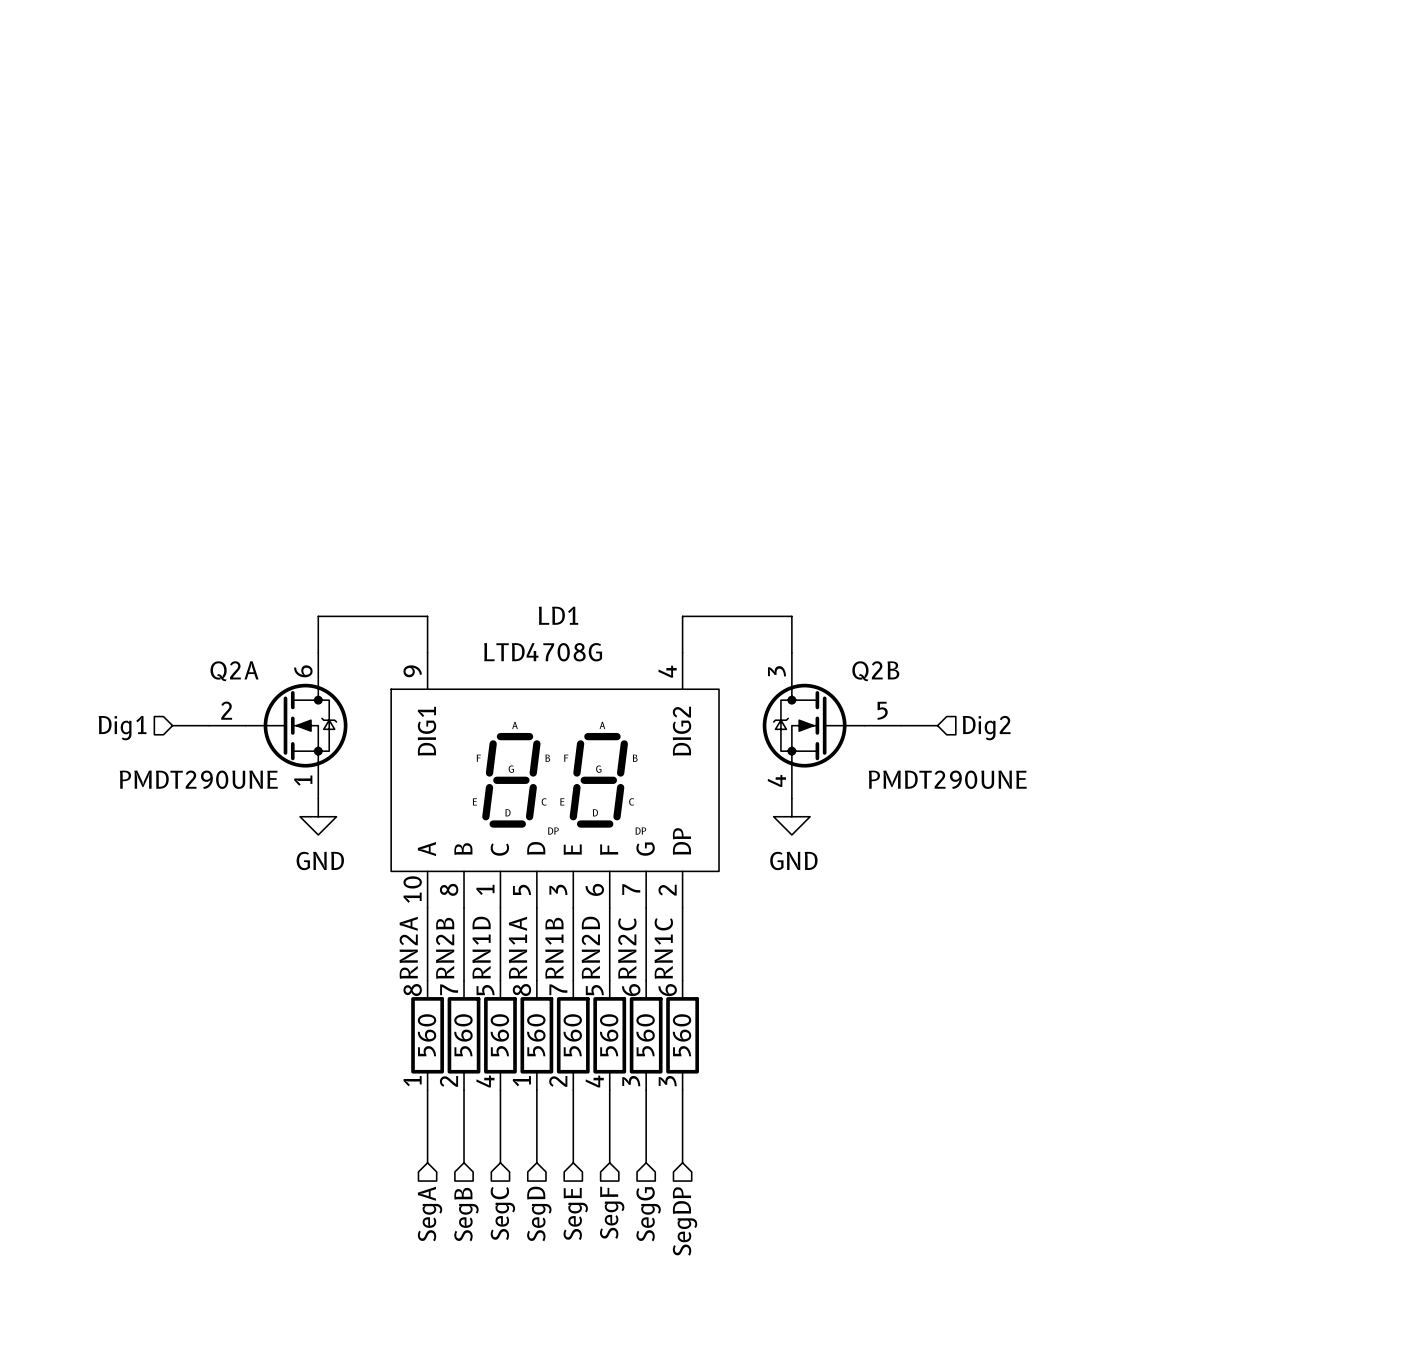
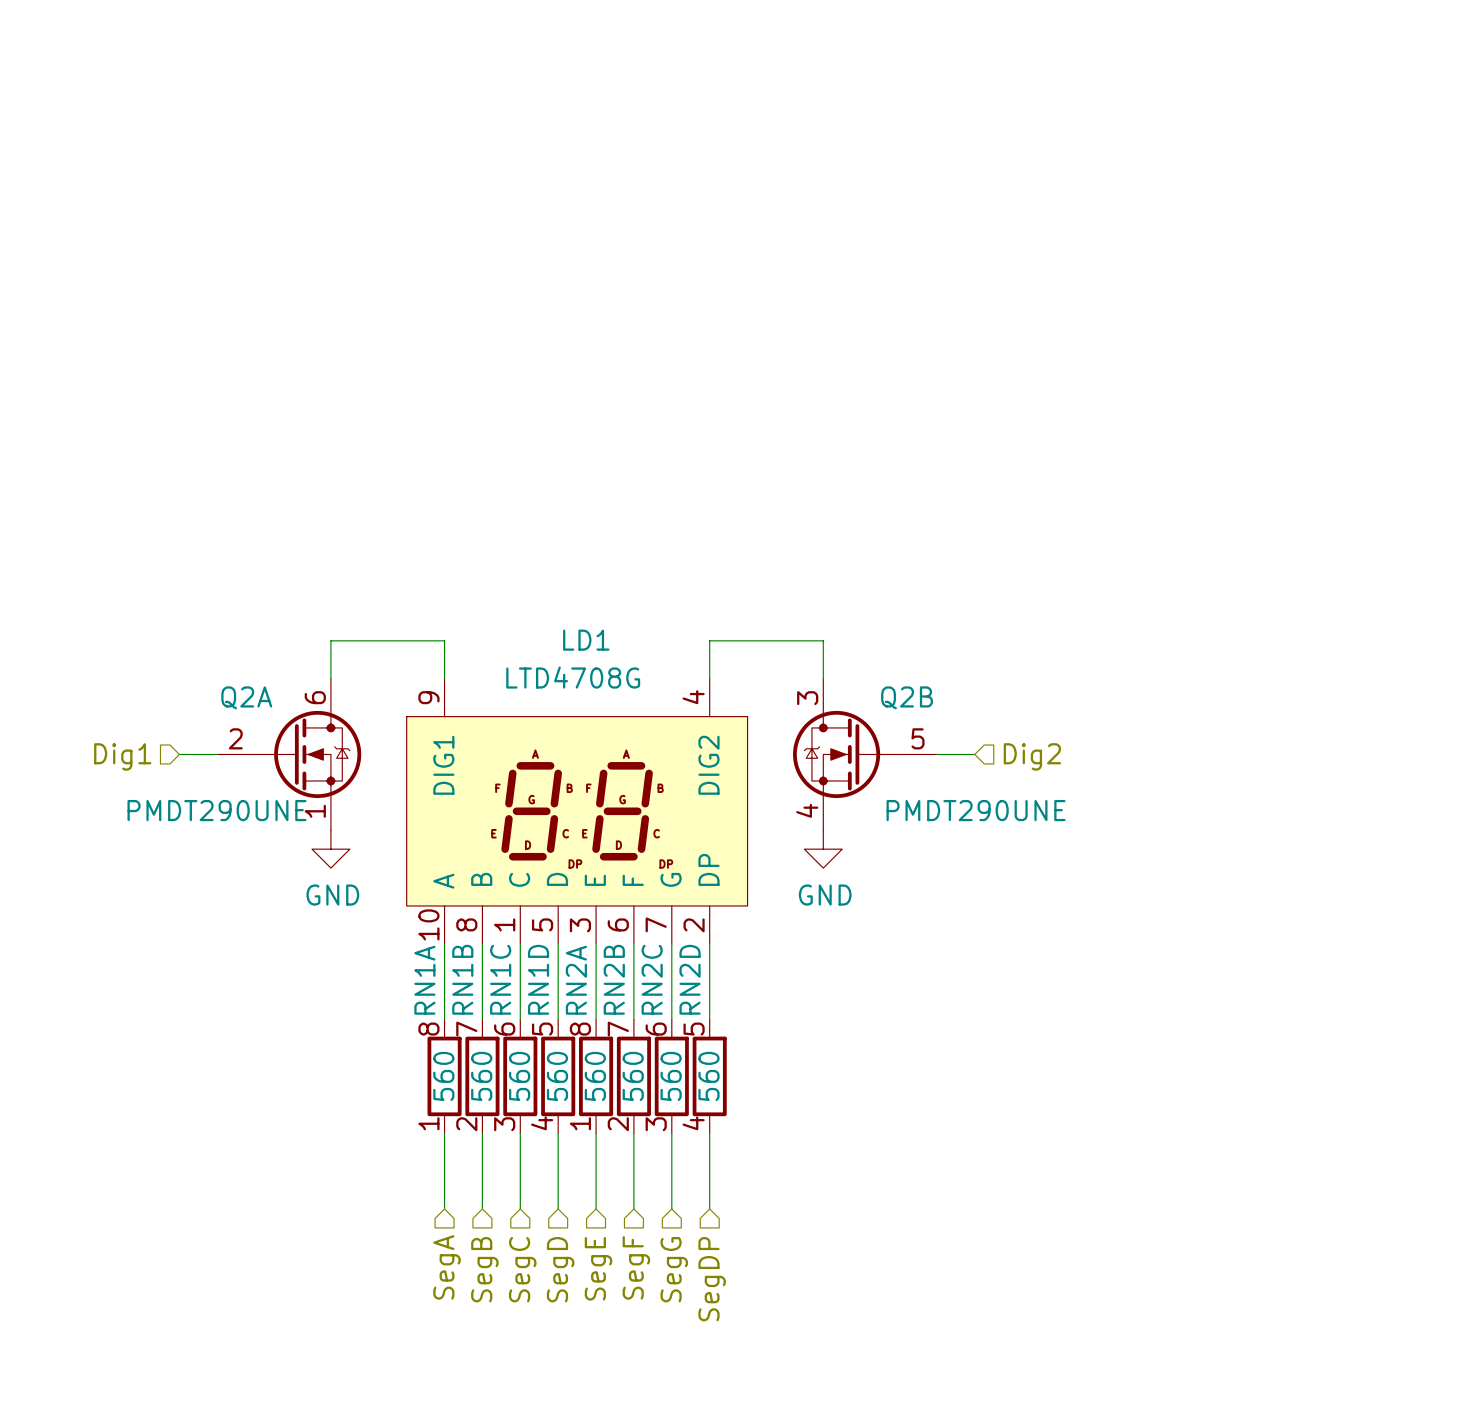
RN2A name: RN2A (408, 947) -> RN1A (424, 980)
RN2B name: RN2B (445, 948) -> RN1B (462, 979)
RN1B name: RN1B (554, 948) -> RN2A (576, 980)
RN1B pin number: 7 (558, 989) -> 8 (580, 1029)
RN1D position: (500, 1035) -> (558, 1076)
RN1A: 560 (536, 1035) -> none
RN2D position: (609, 1035) -> (709, 1076)
RN2B: none -> 560 (633, 1076)
RN1C position: (682, 1035) -> (520, 1076)
RN1B pin number: 2 (558, 1081) -> 1 (580, 1123)

